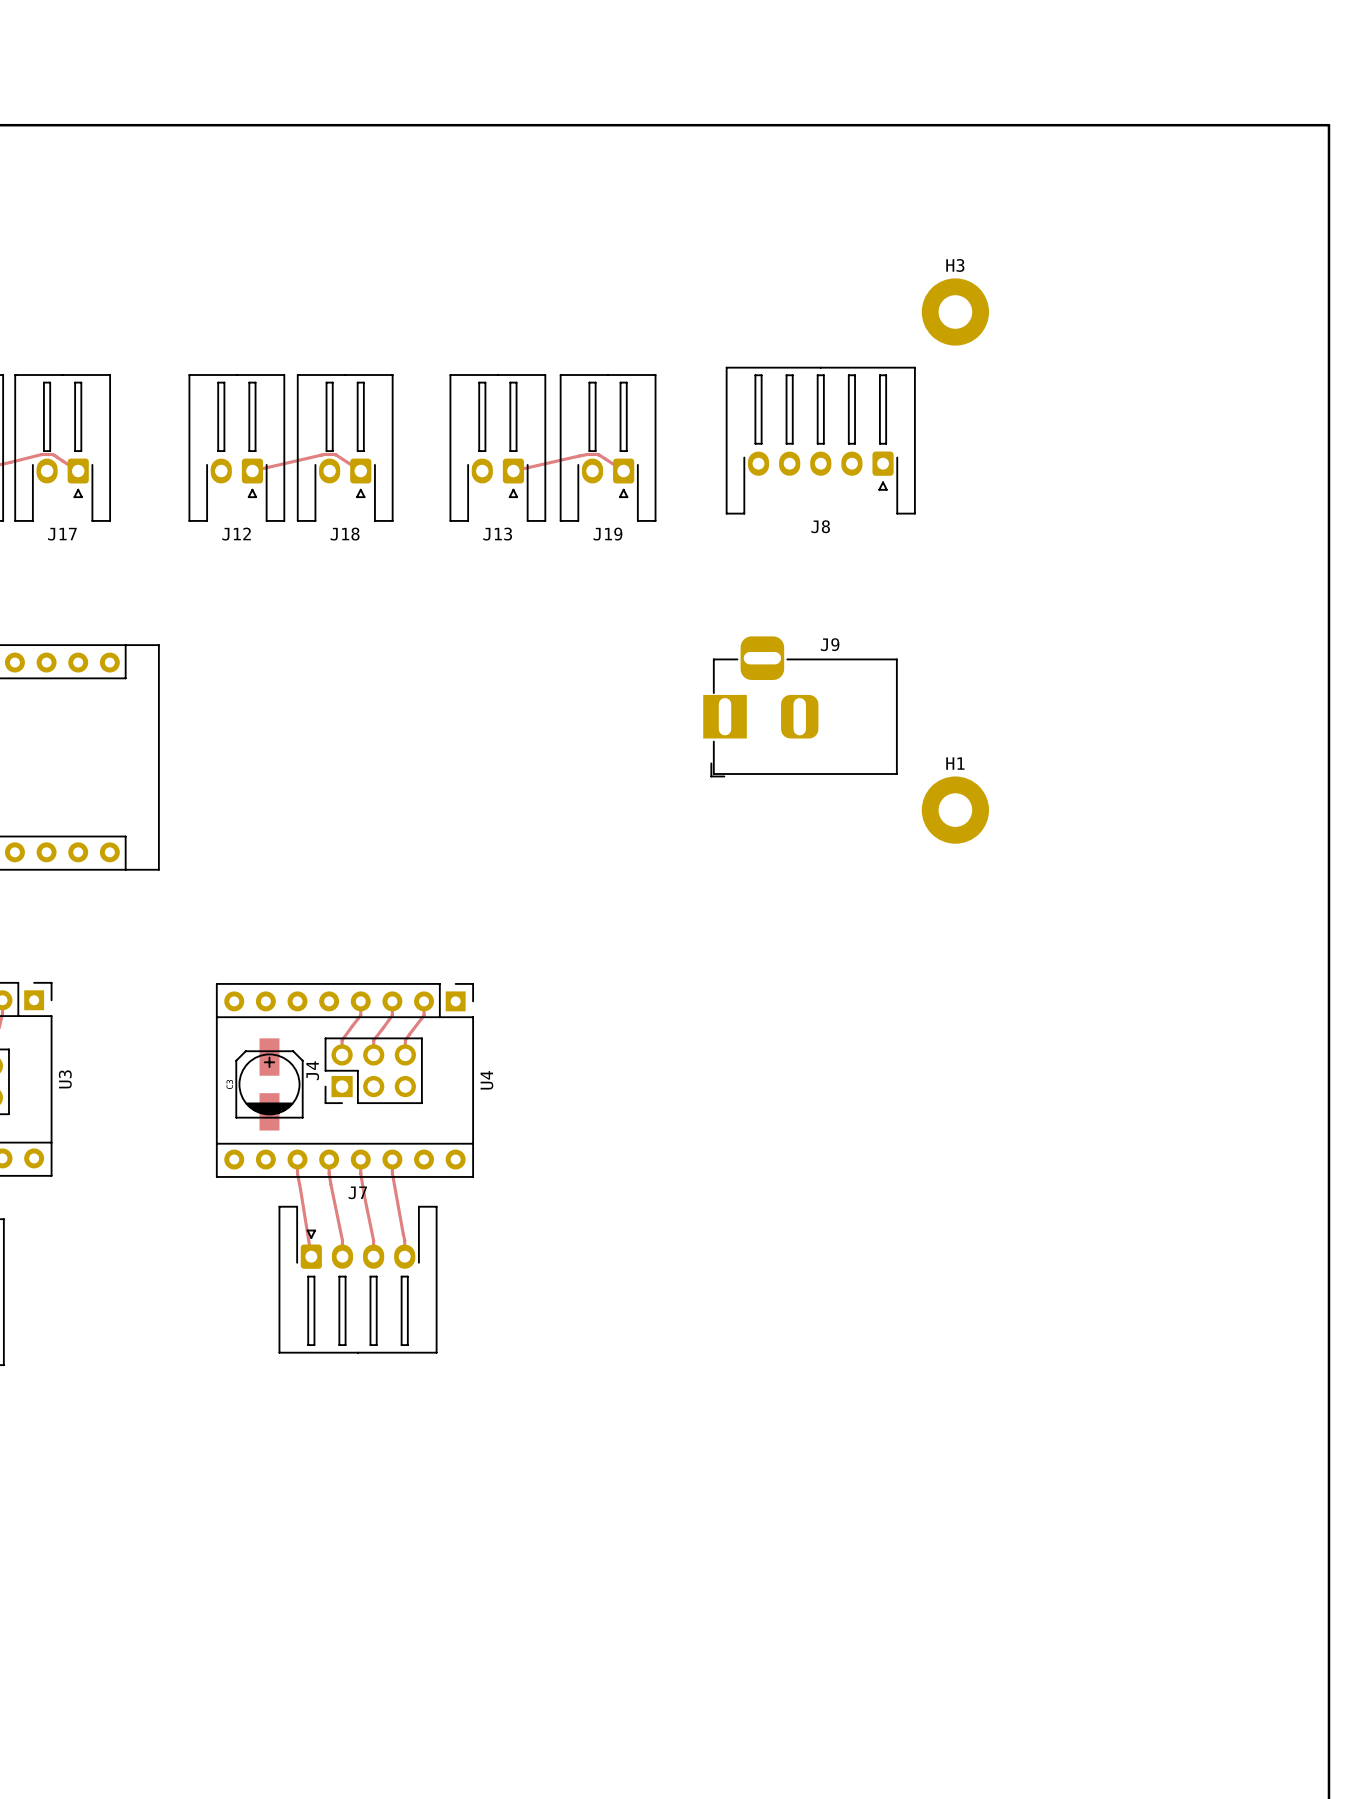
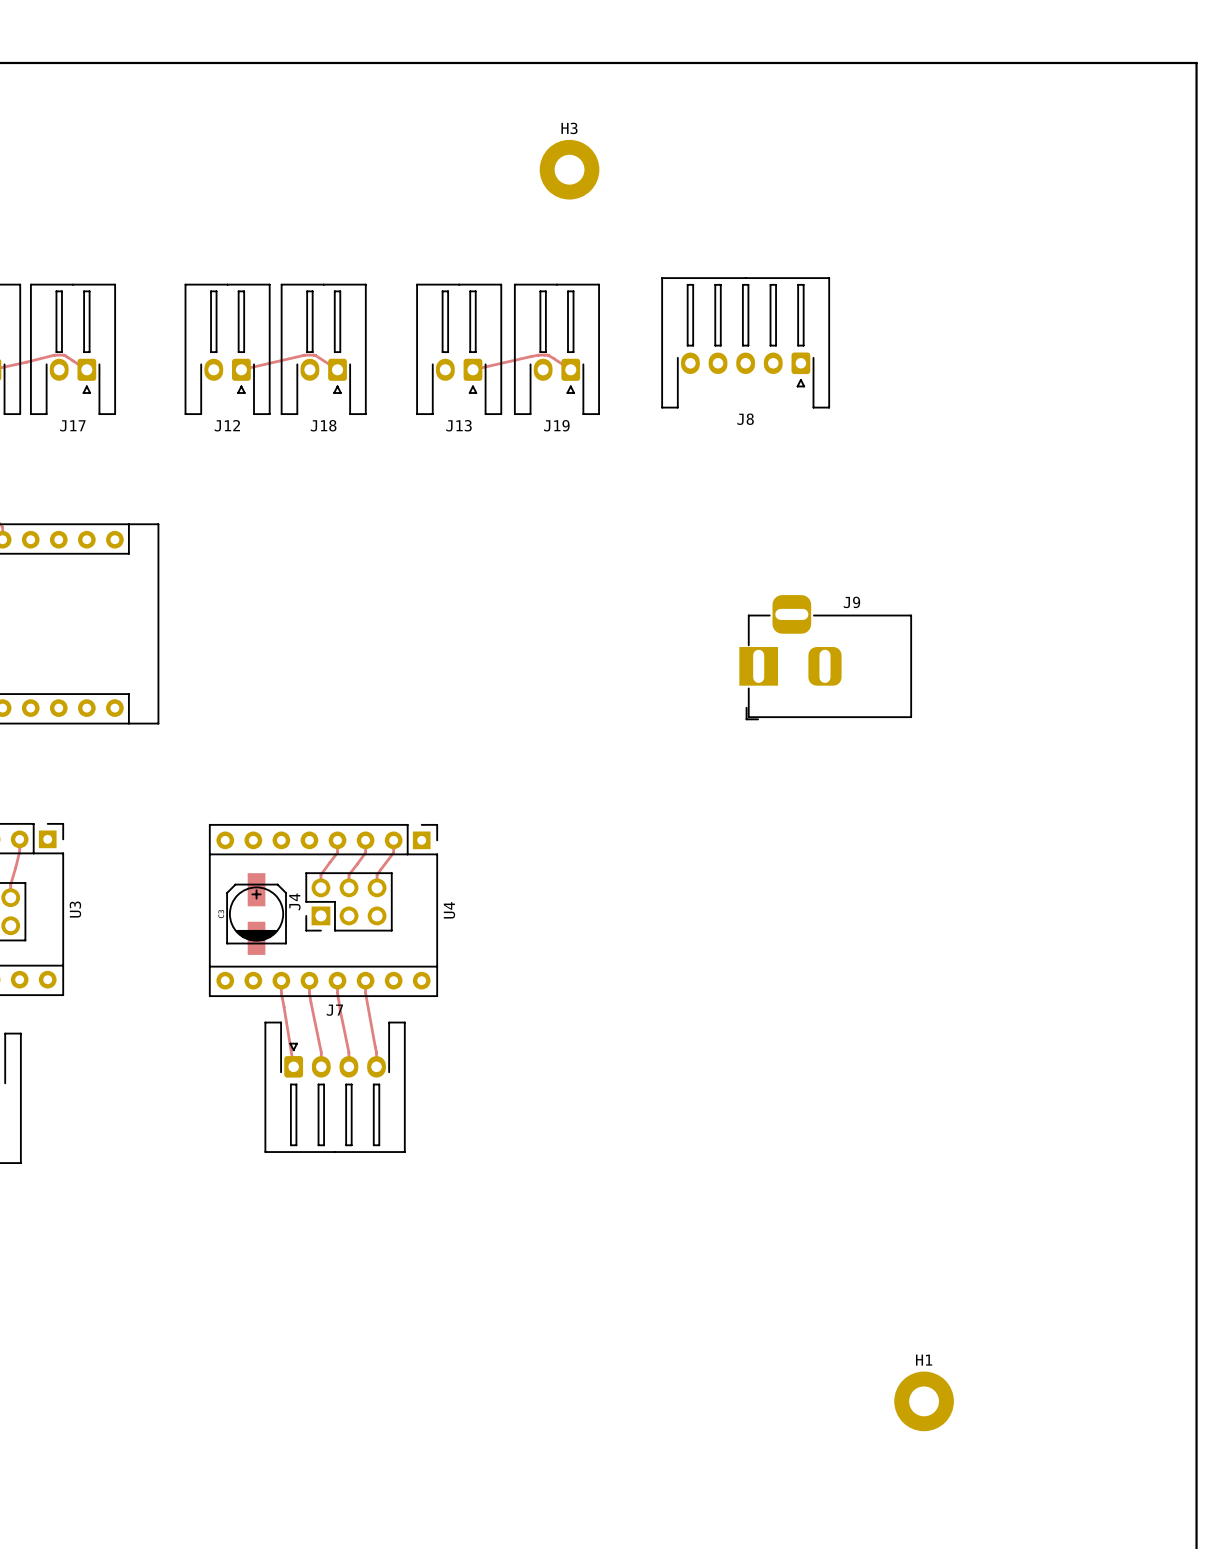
H3 position: (955, 311) -> (569, 169)
J9 position: (800, 706) -> (825, 657)
H1 position: (955, 810) -> (924, 1401)

